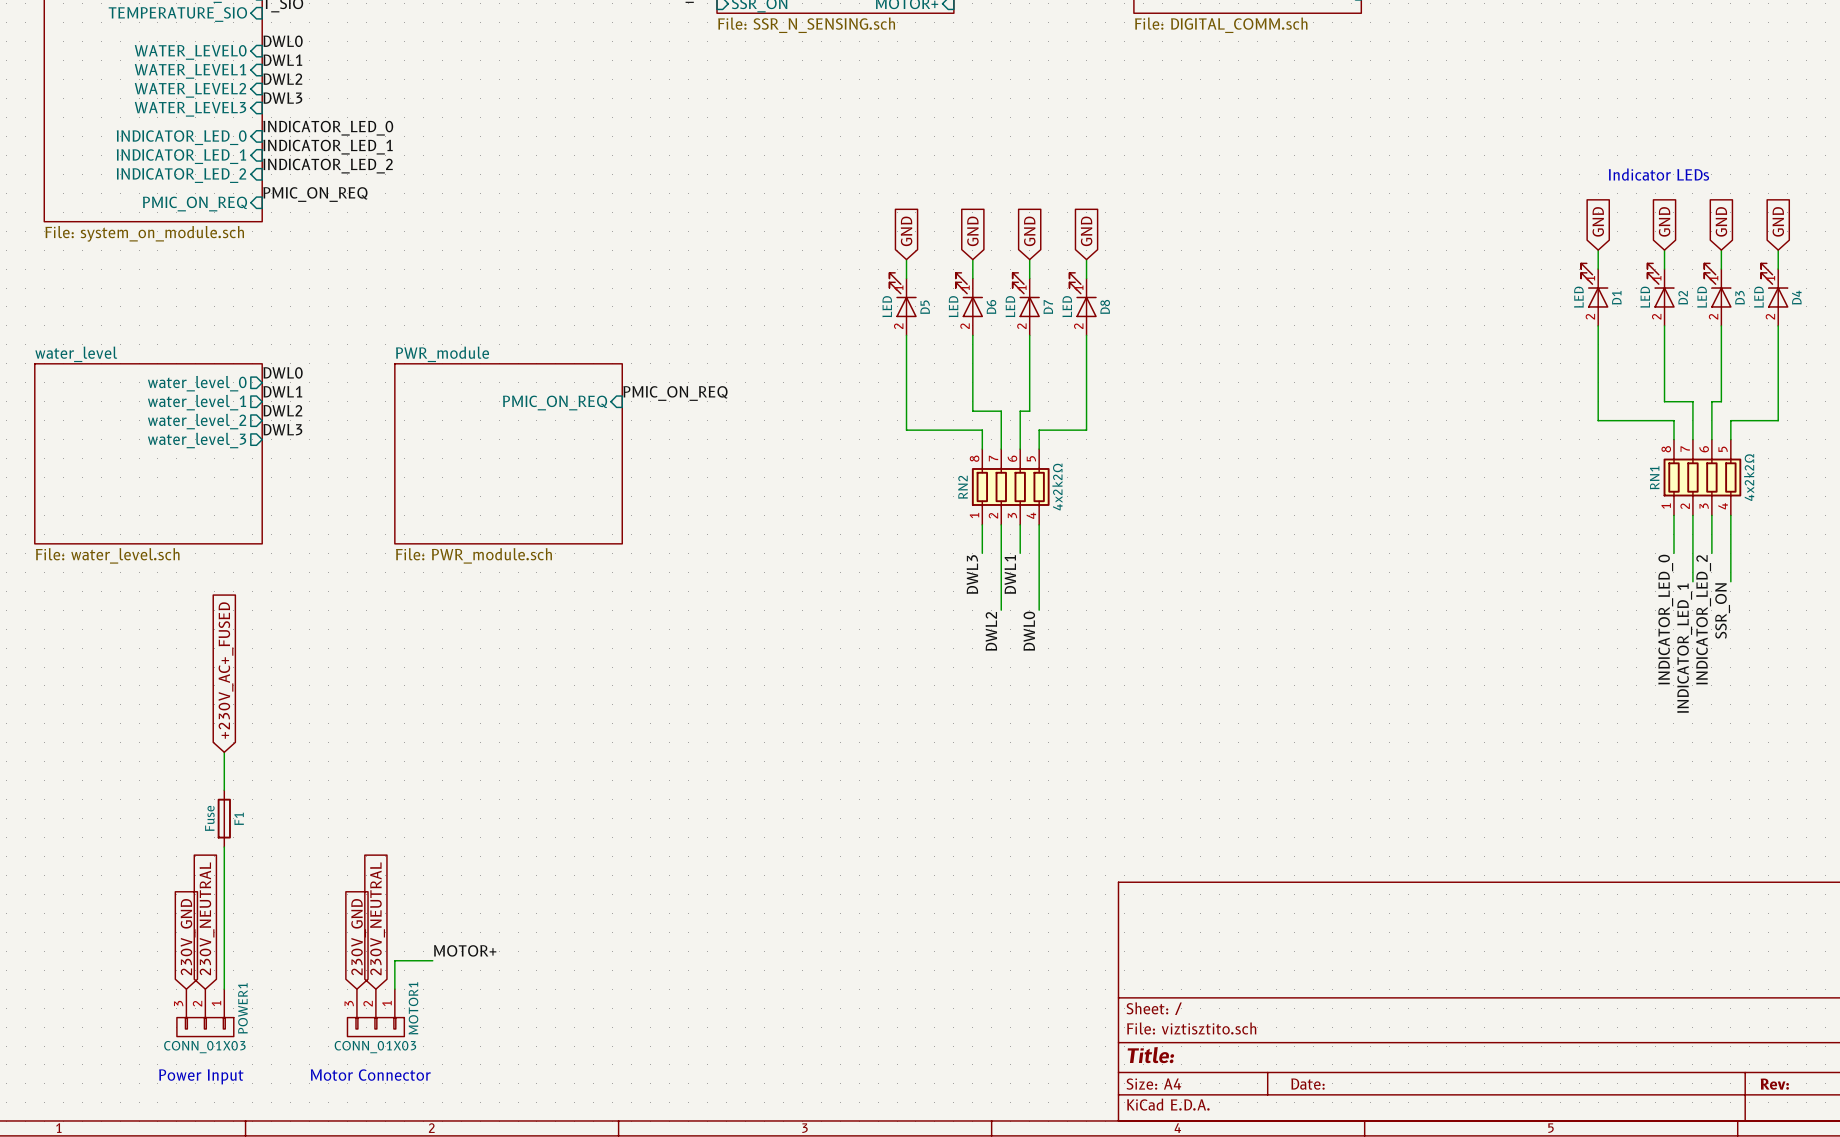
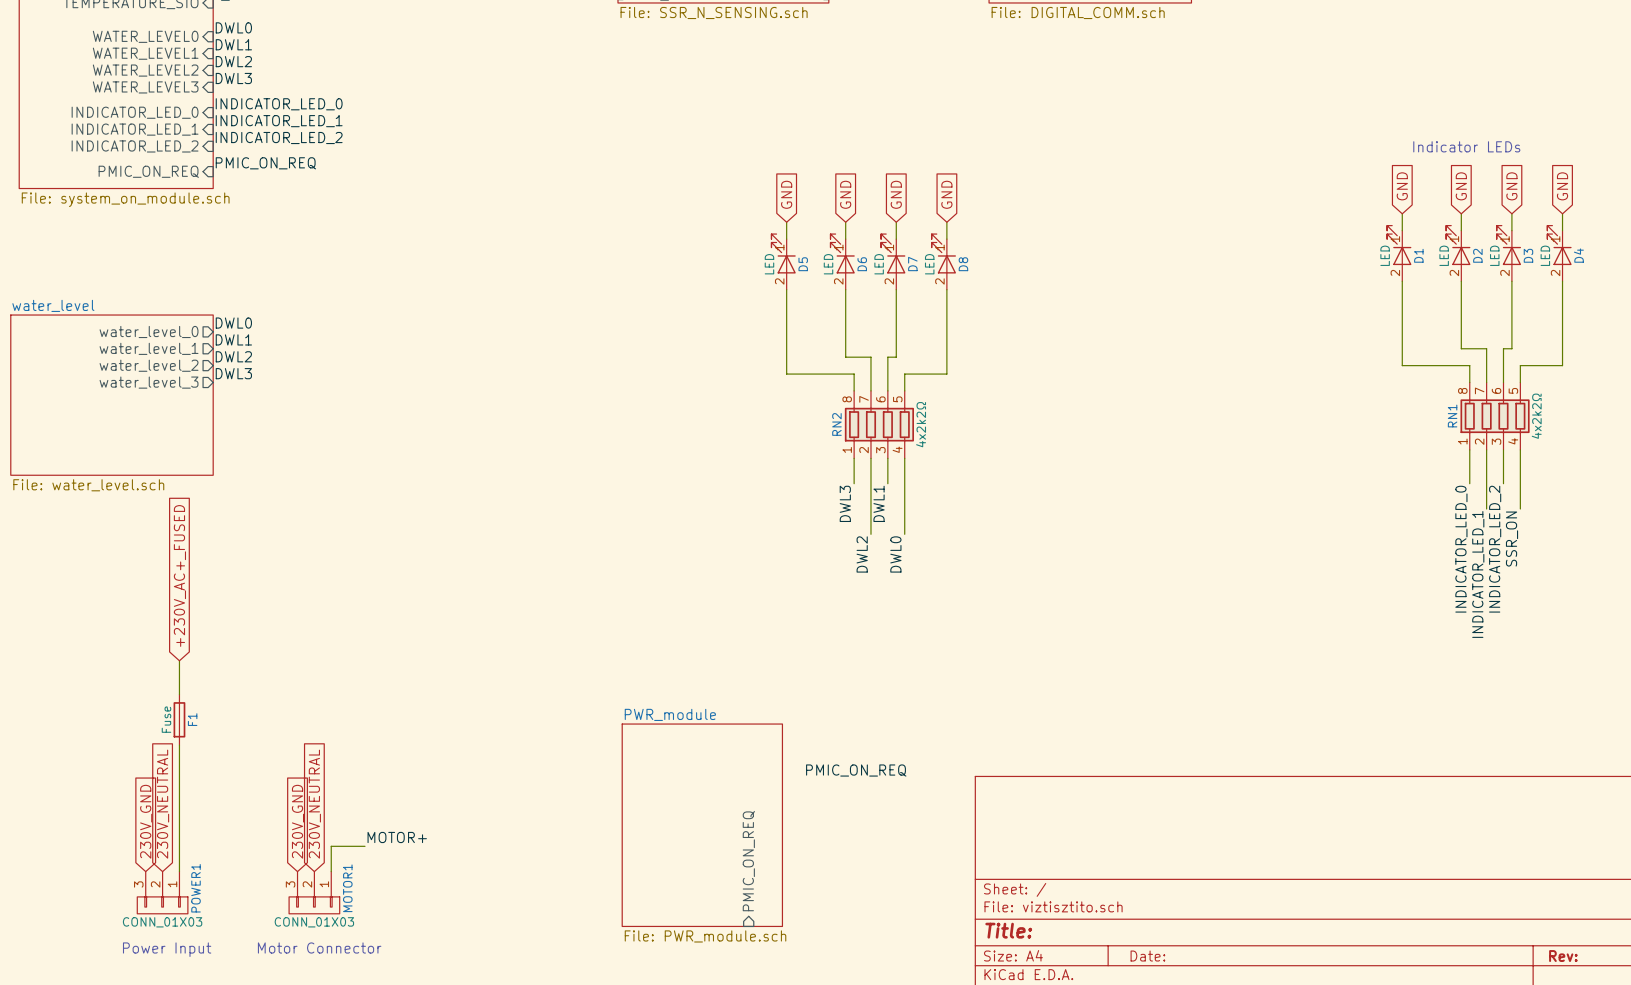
label: PMIC_ON_REQ (675, 393) -> none
sheet pin: PMIC_ON_REQ (555, 402) -> none
sheet PWR_module: File: PWR_module.sch (508, 453) -> none
label: none -> PMIC_ON_REQ (856, 770)
sheet PWR_module: none -> File: PWR_module.sch (702, 825)
sheet pin: none -> PMIC_ON_REQ (748, 861)

